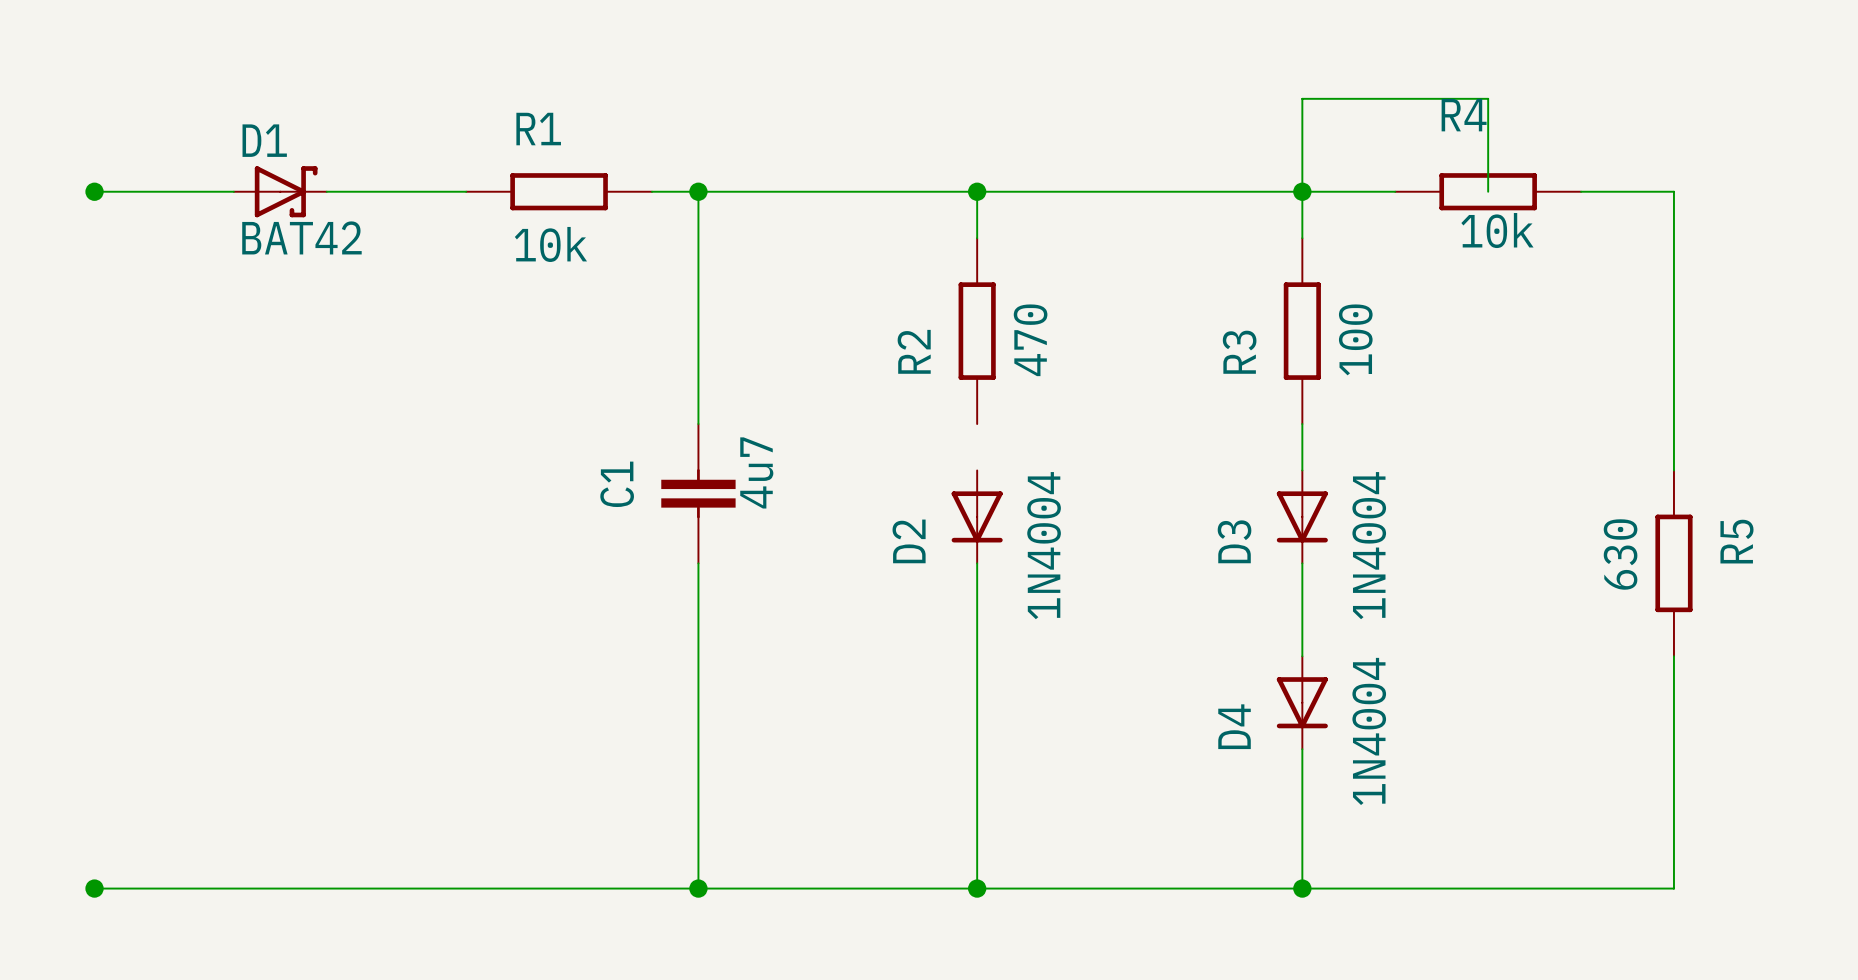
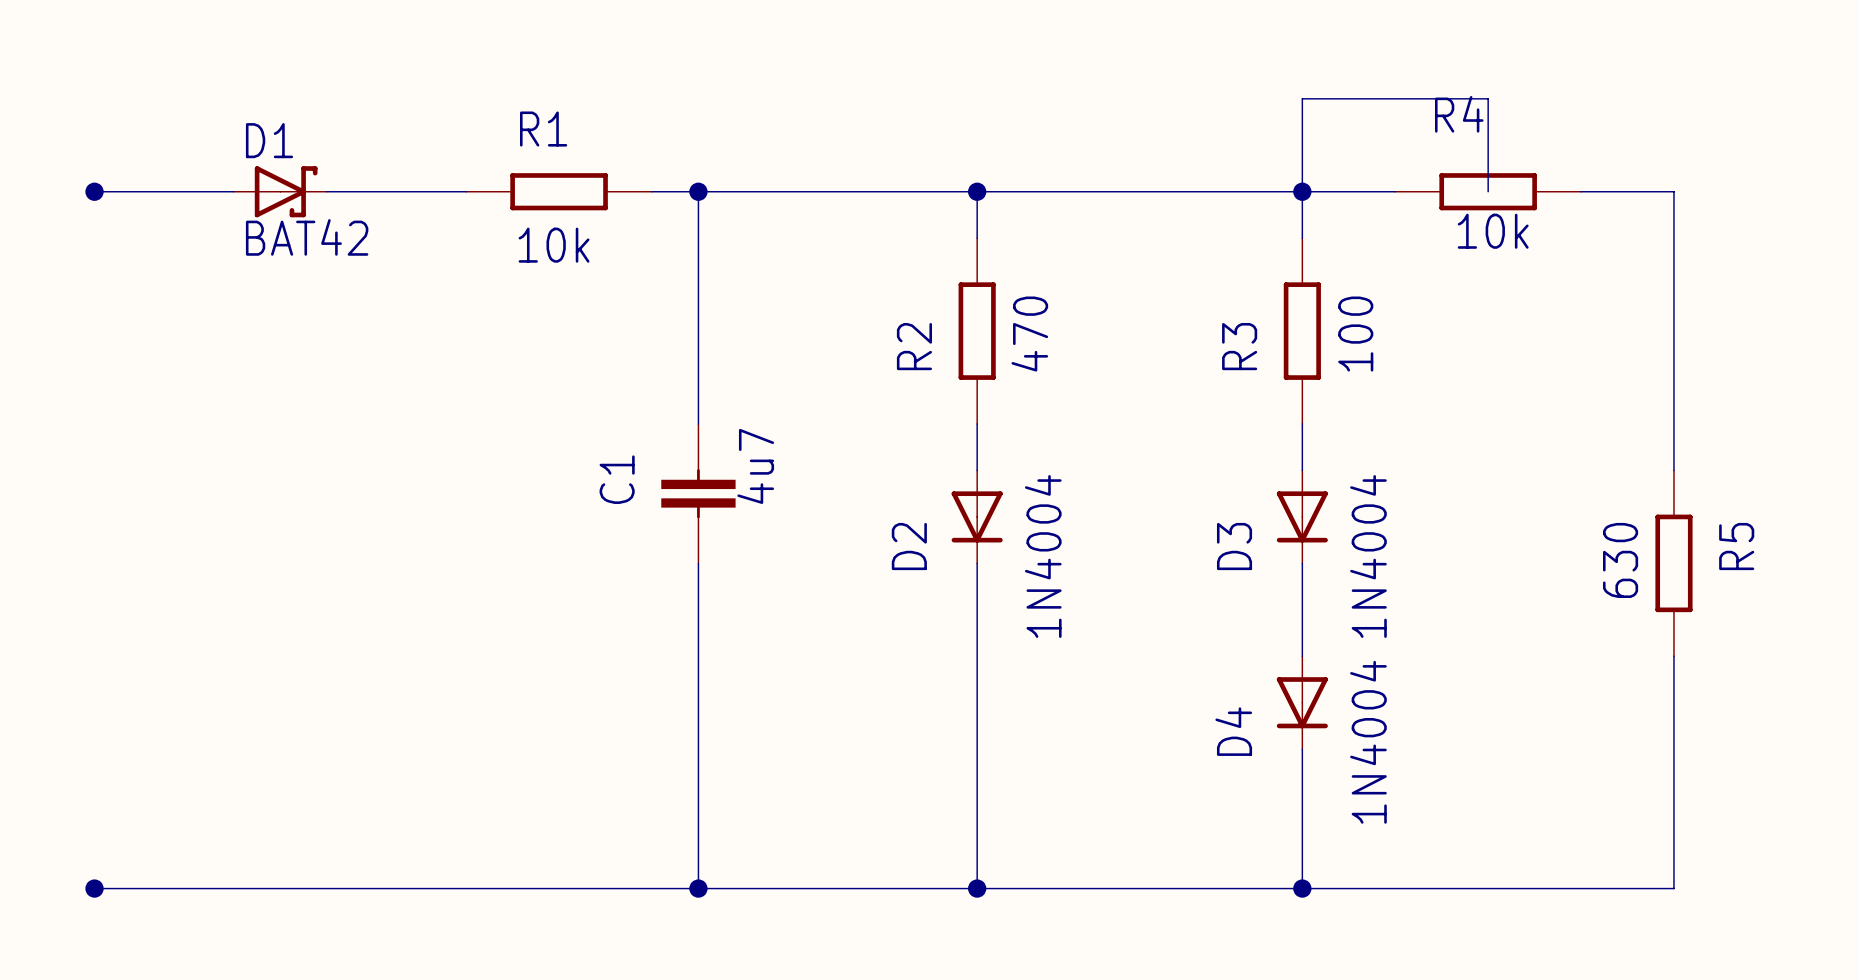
wire: none -> (977, 424) (977, 470)

